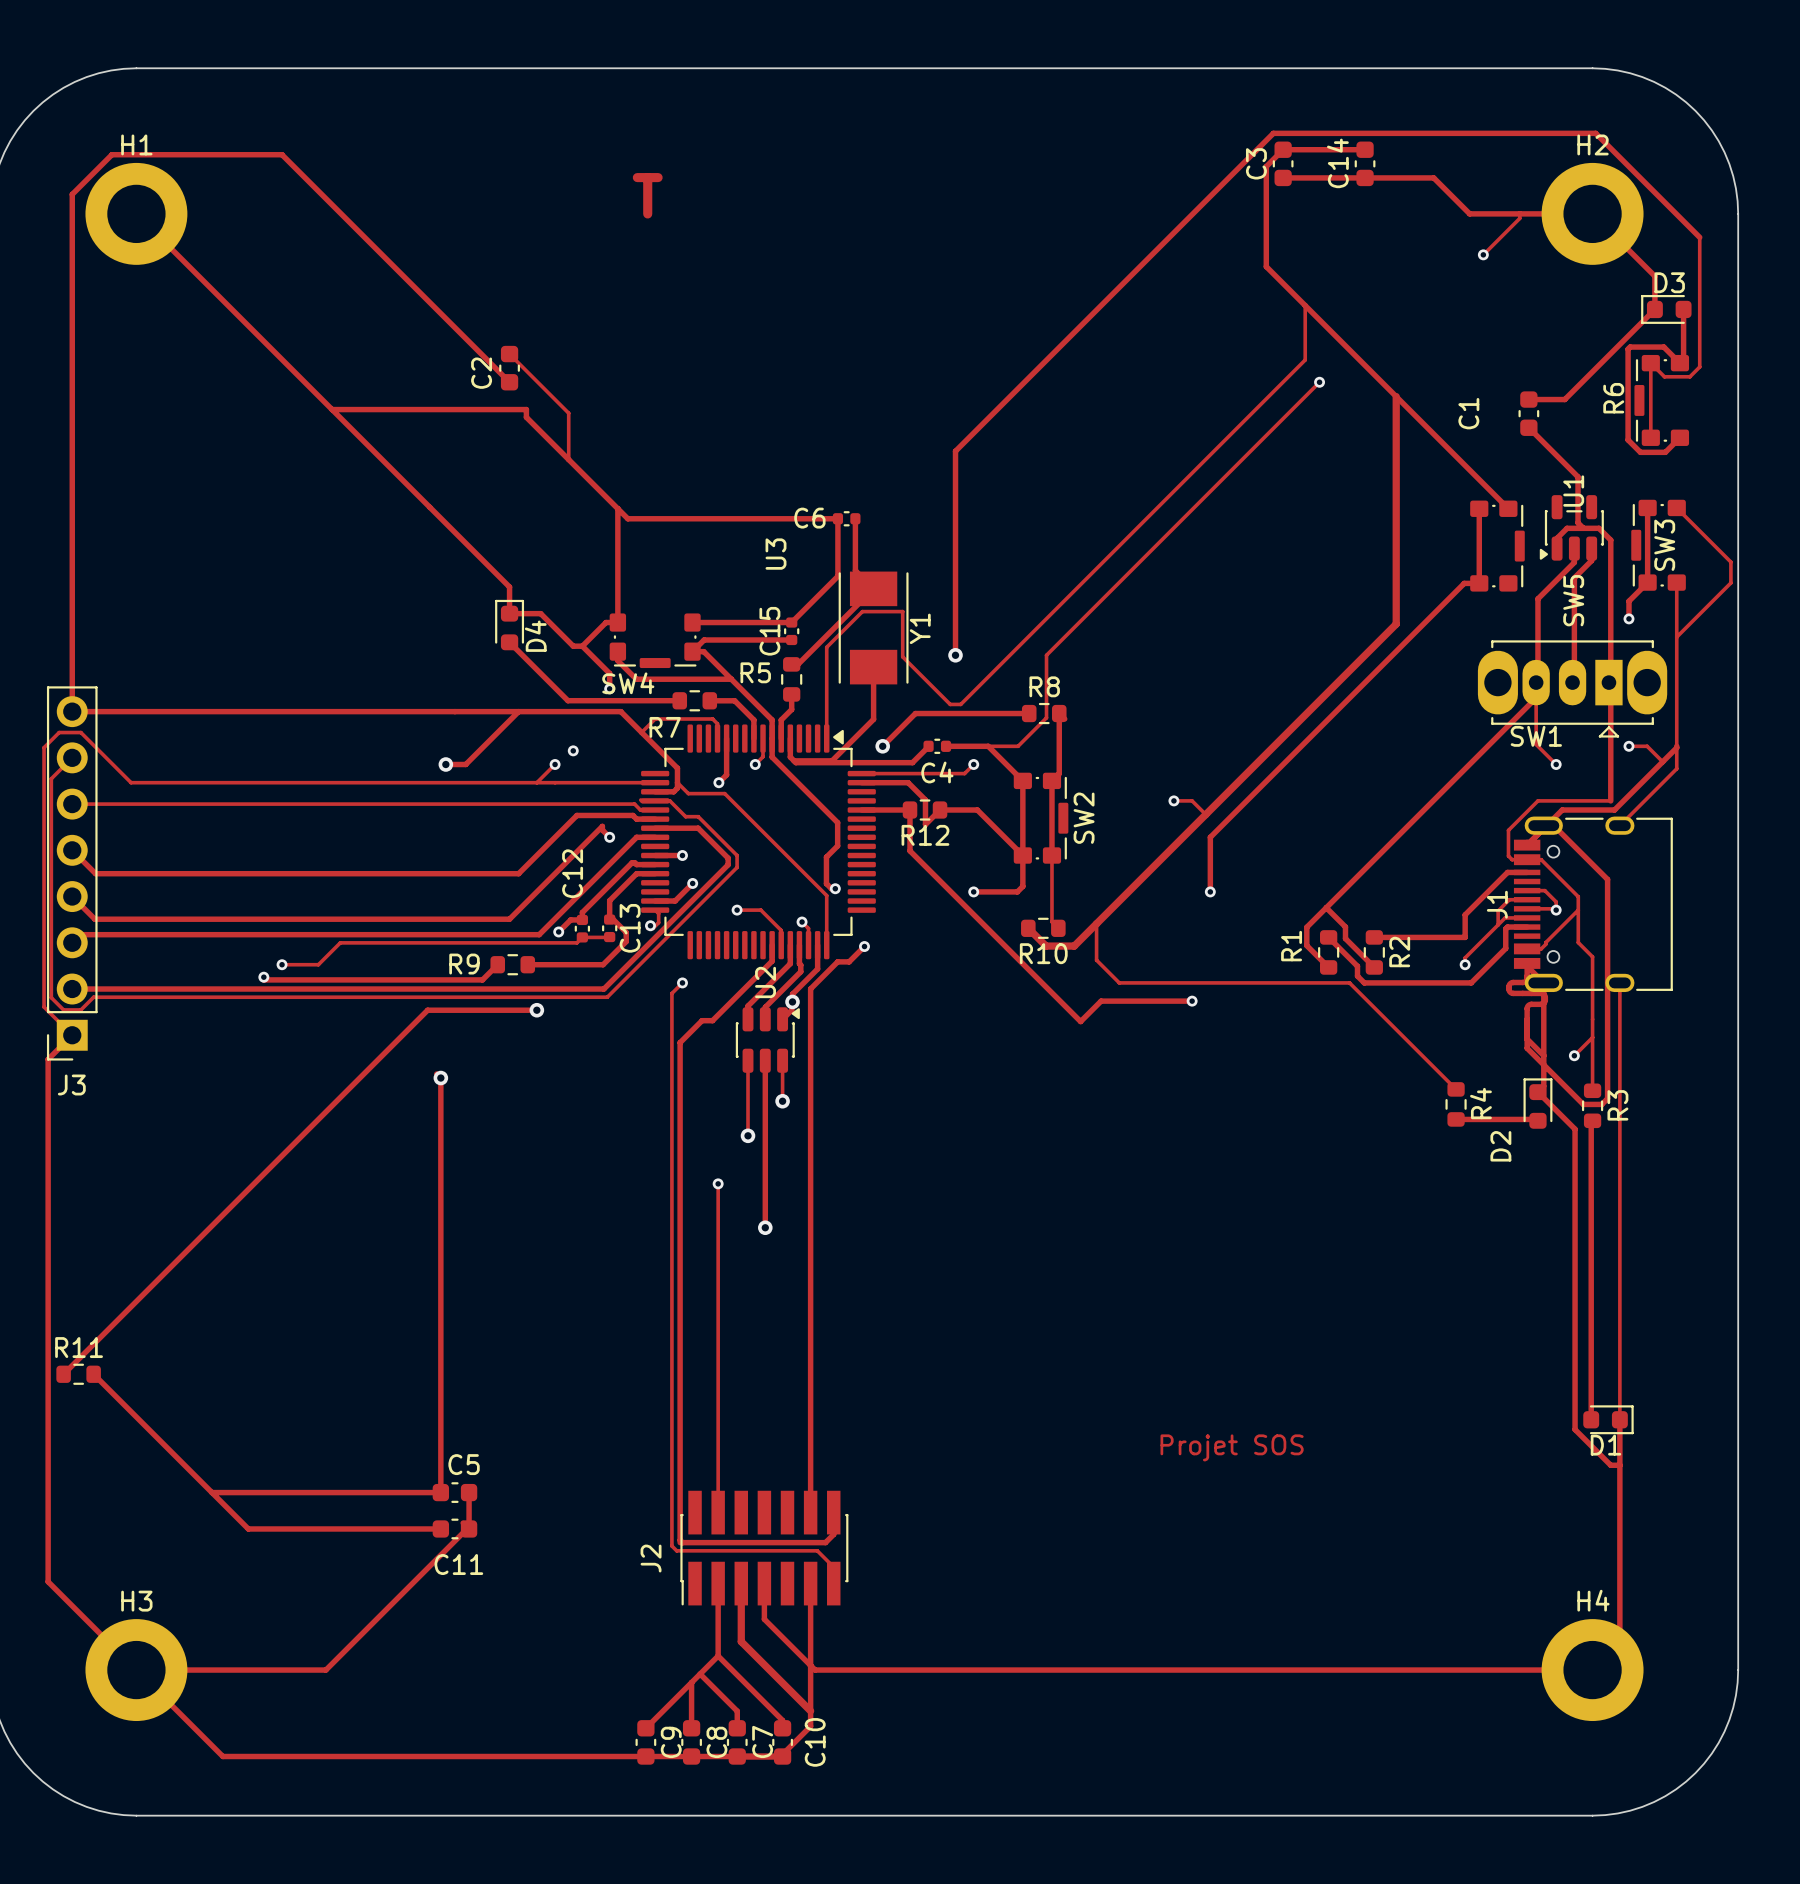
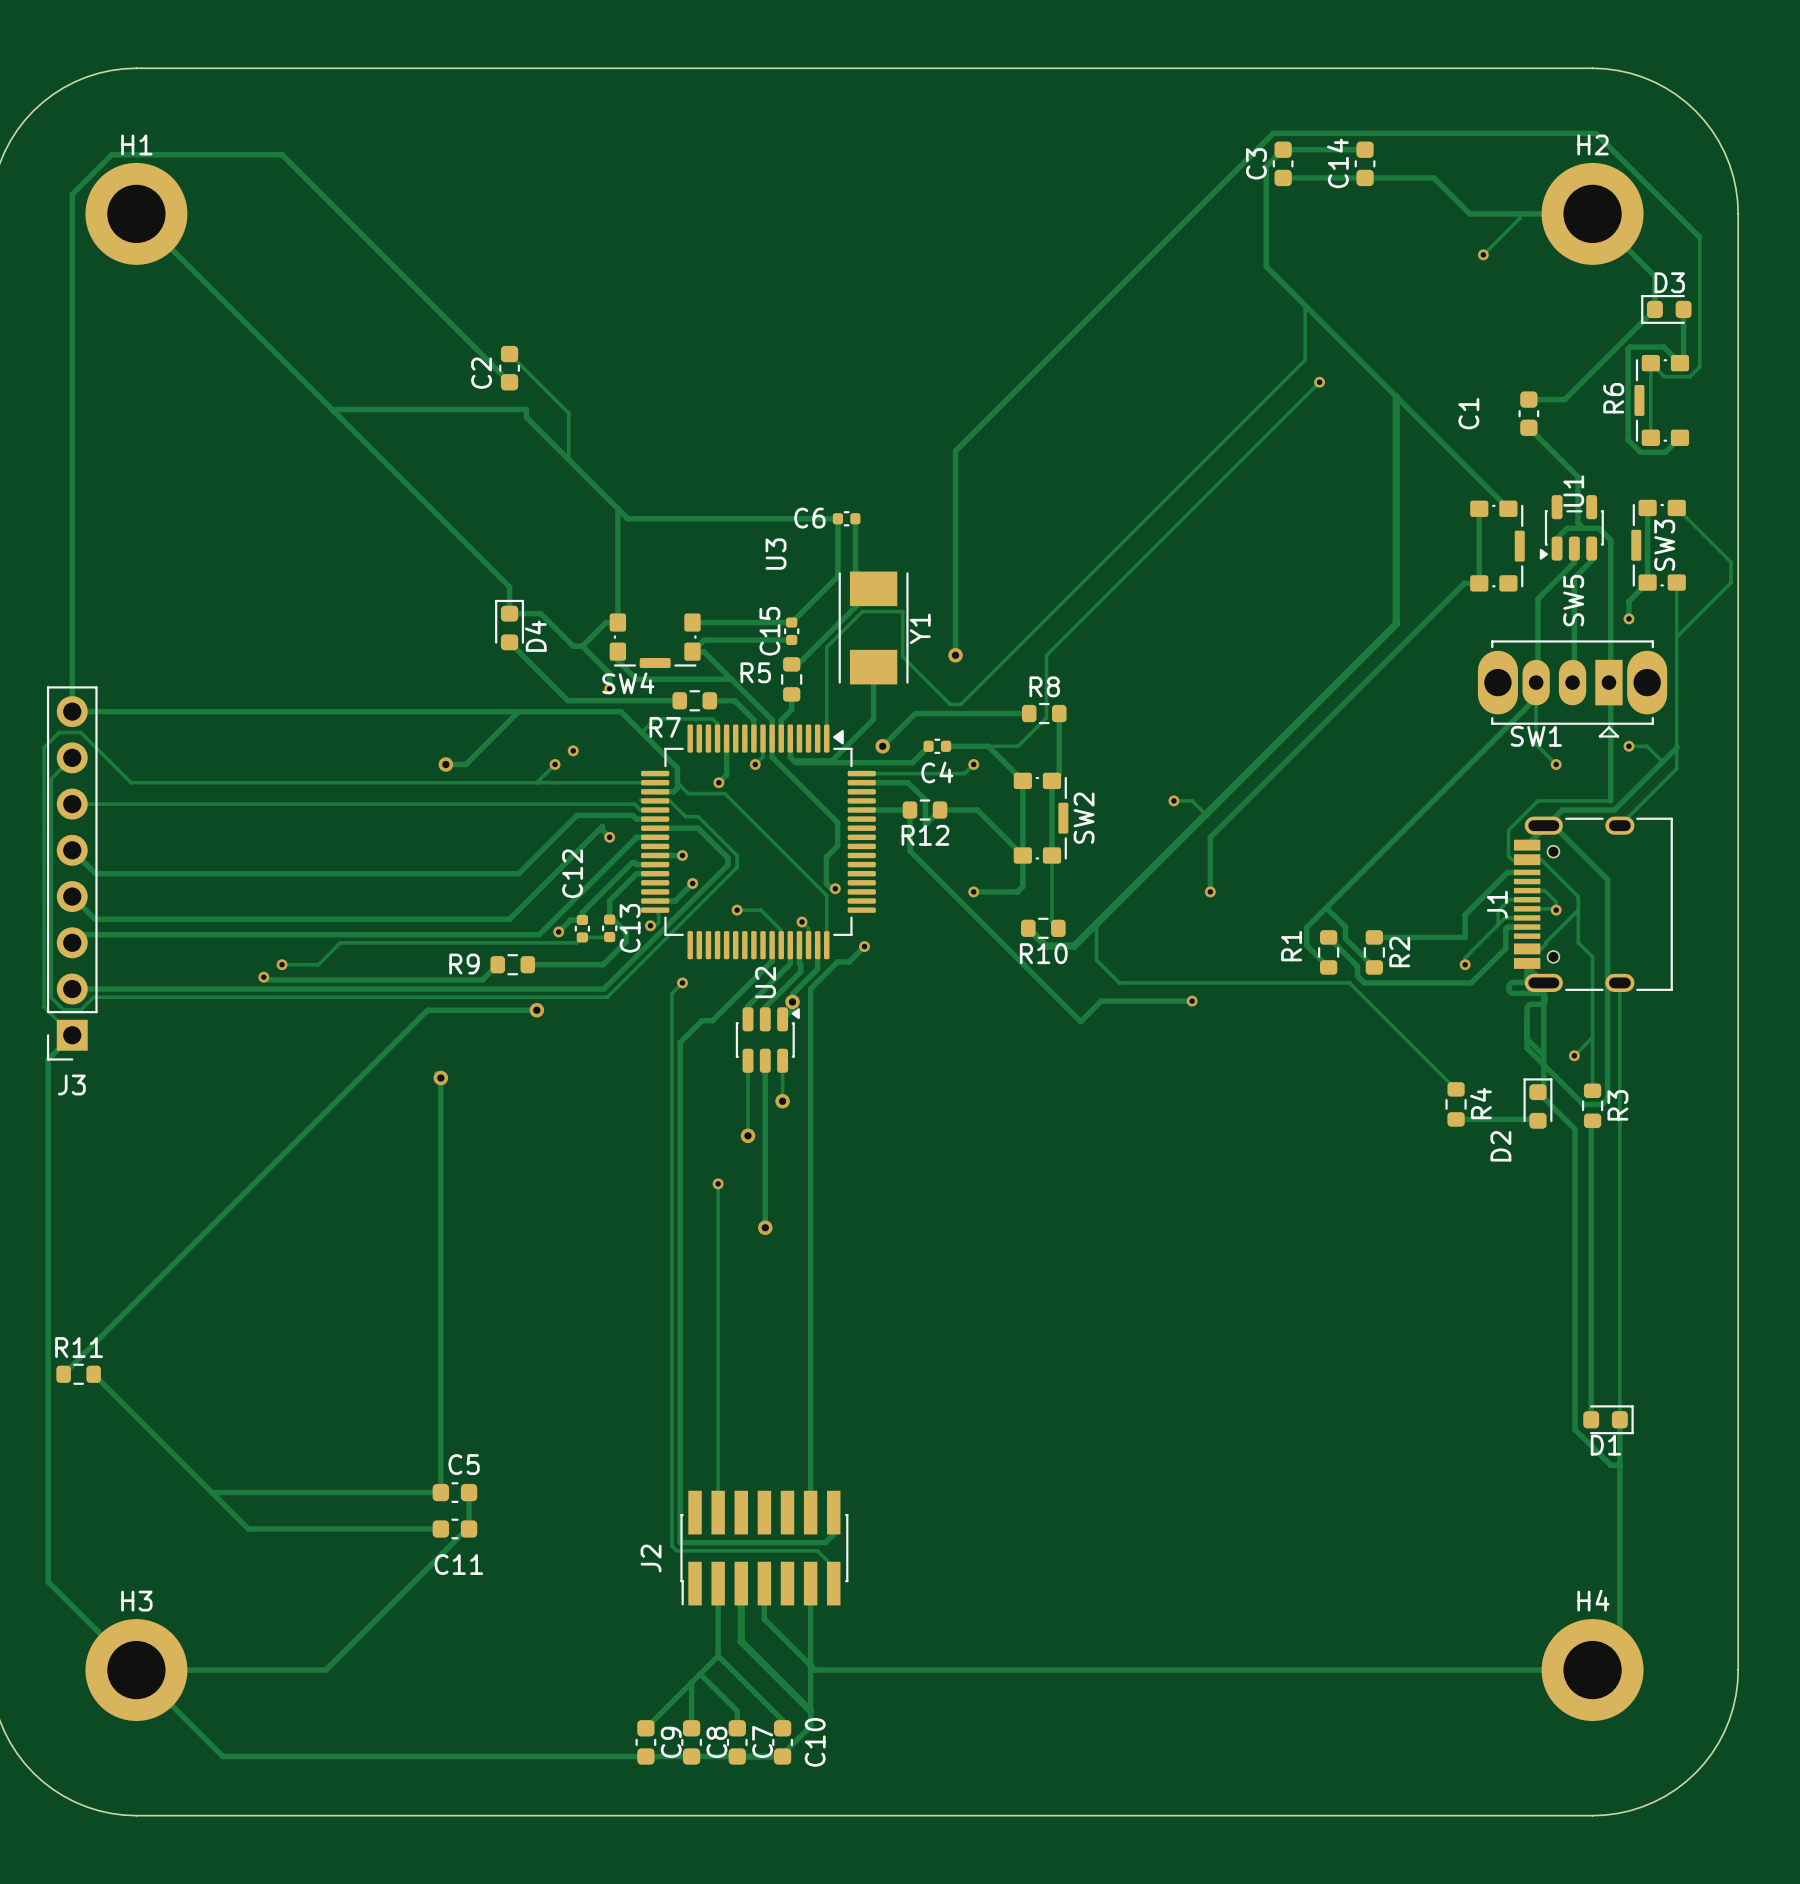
text: T (647, 195) -> none
text: Projet SOS (1232, 1447) -> none

